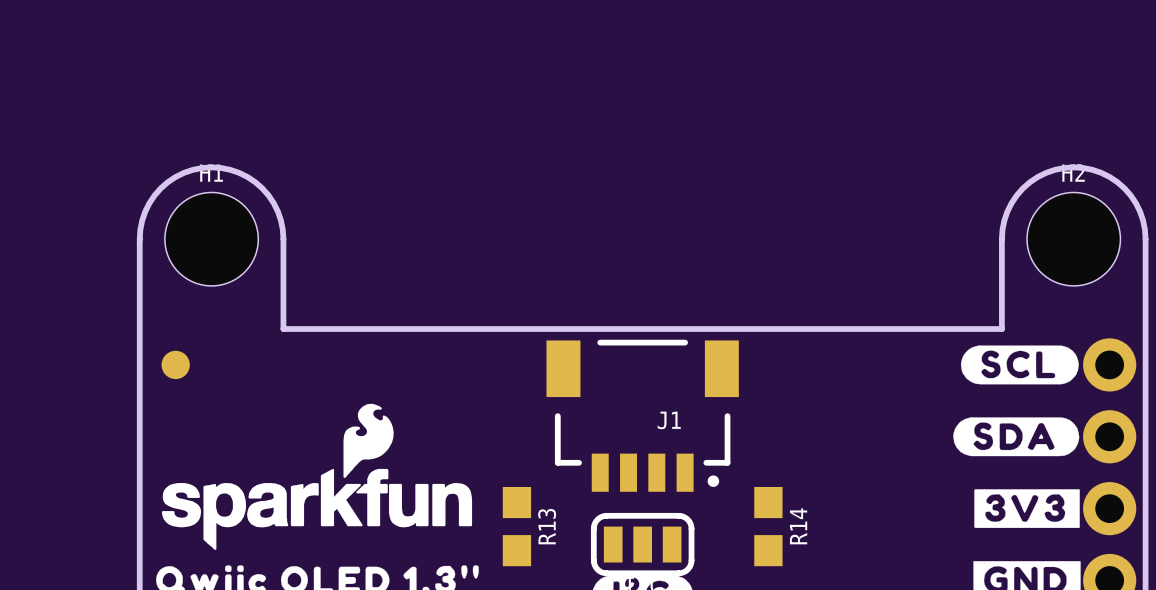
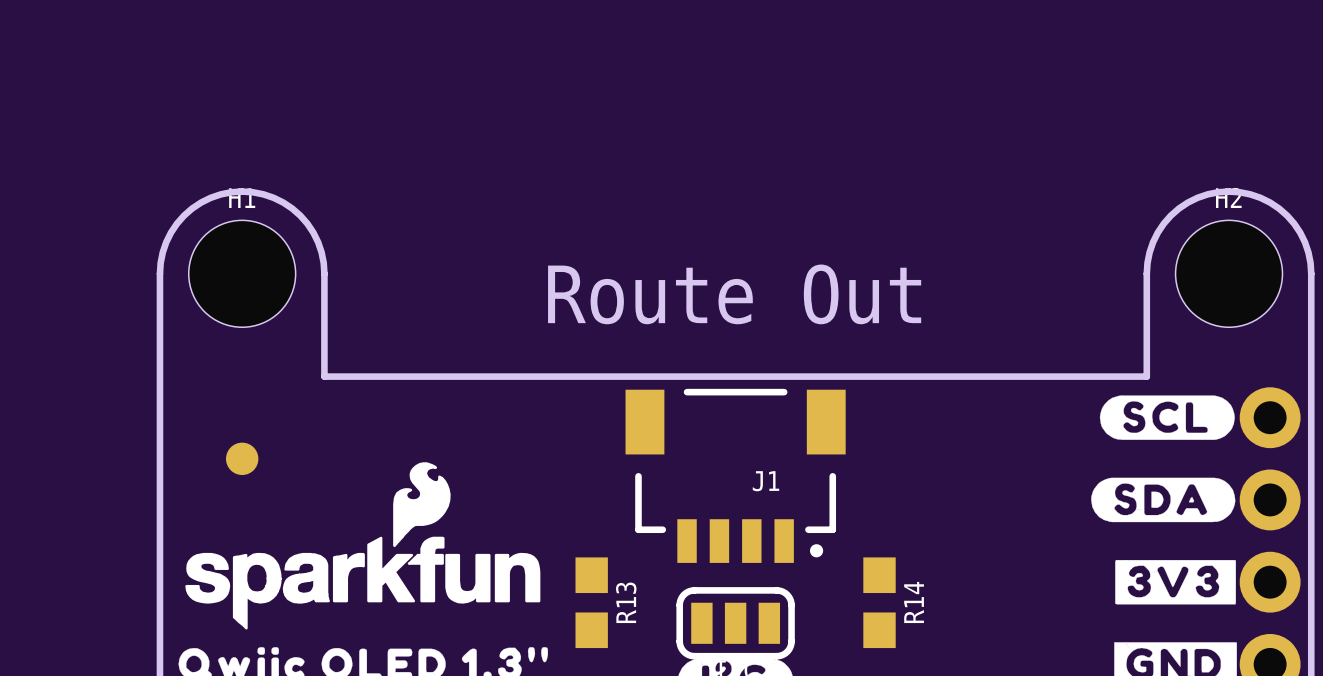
text: none -> Route Out (734, 294)
part position: (175, 364) -> (242, 458)

